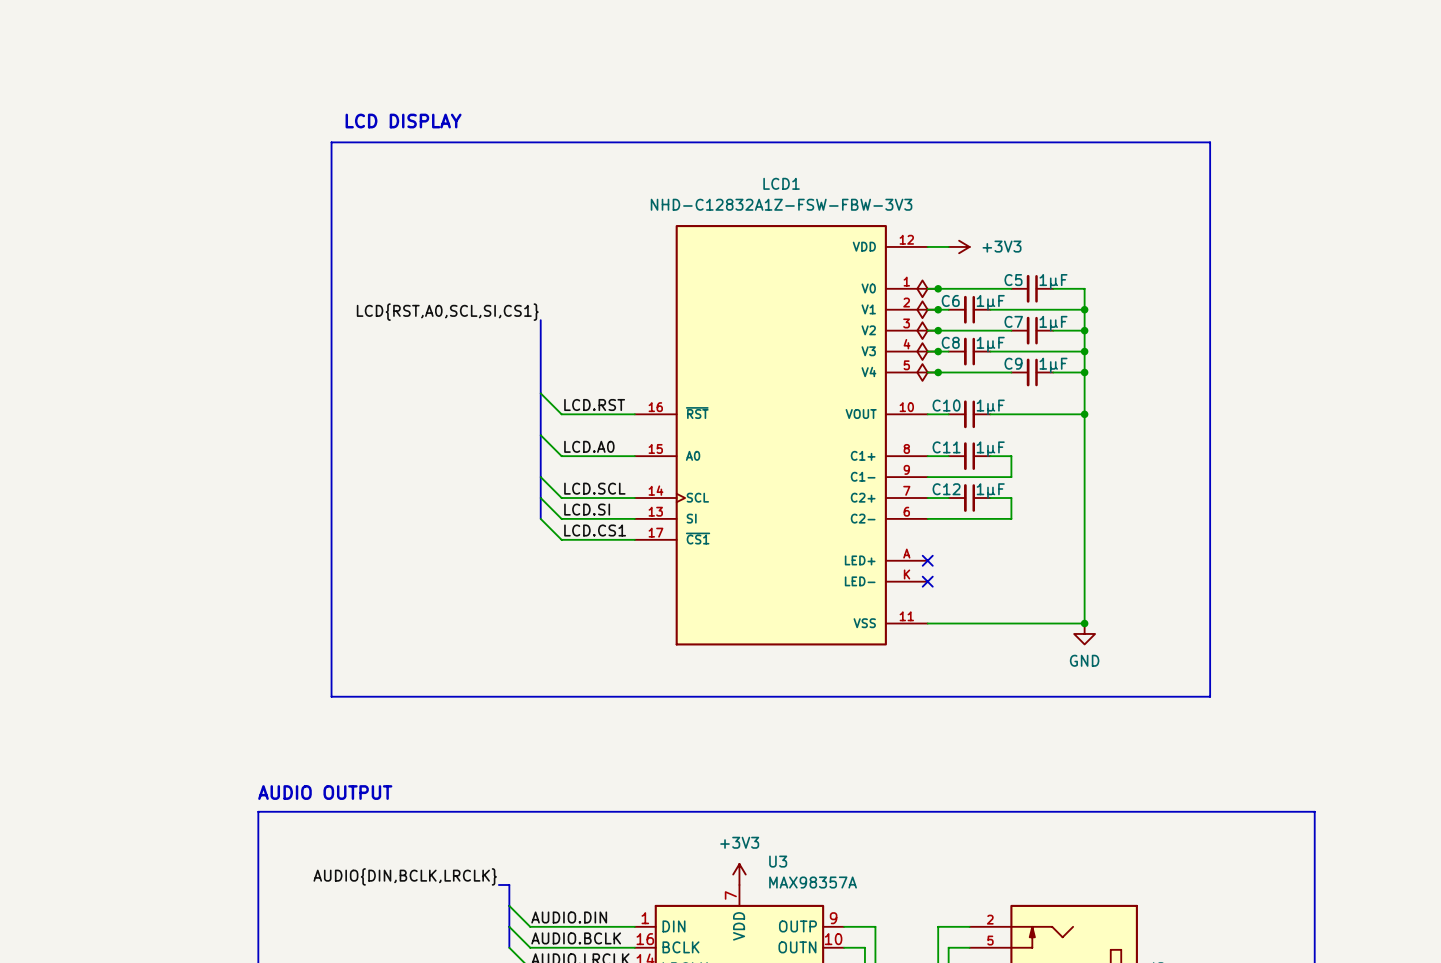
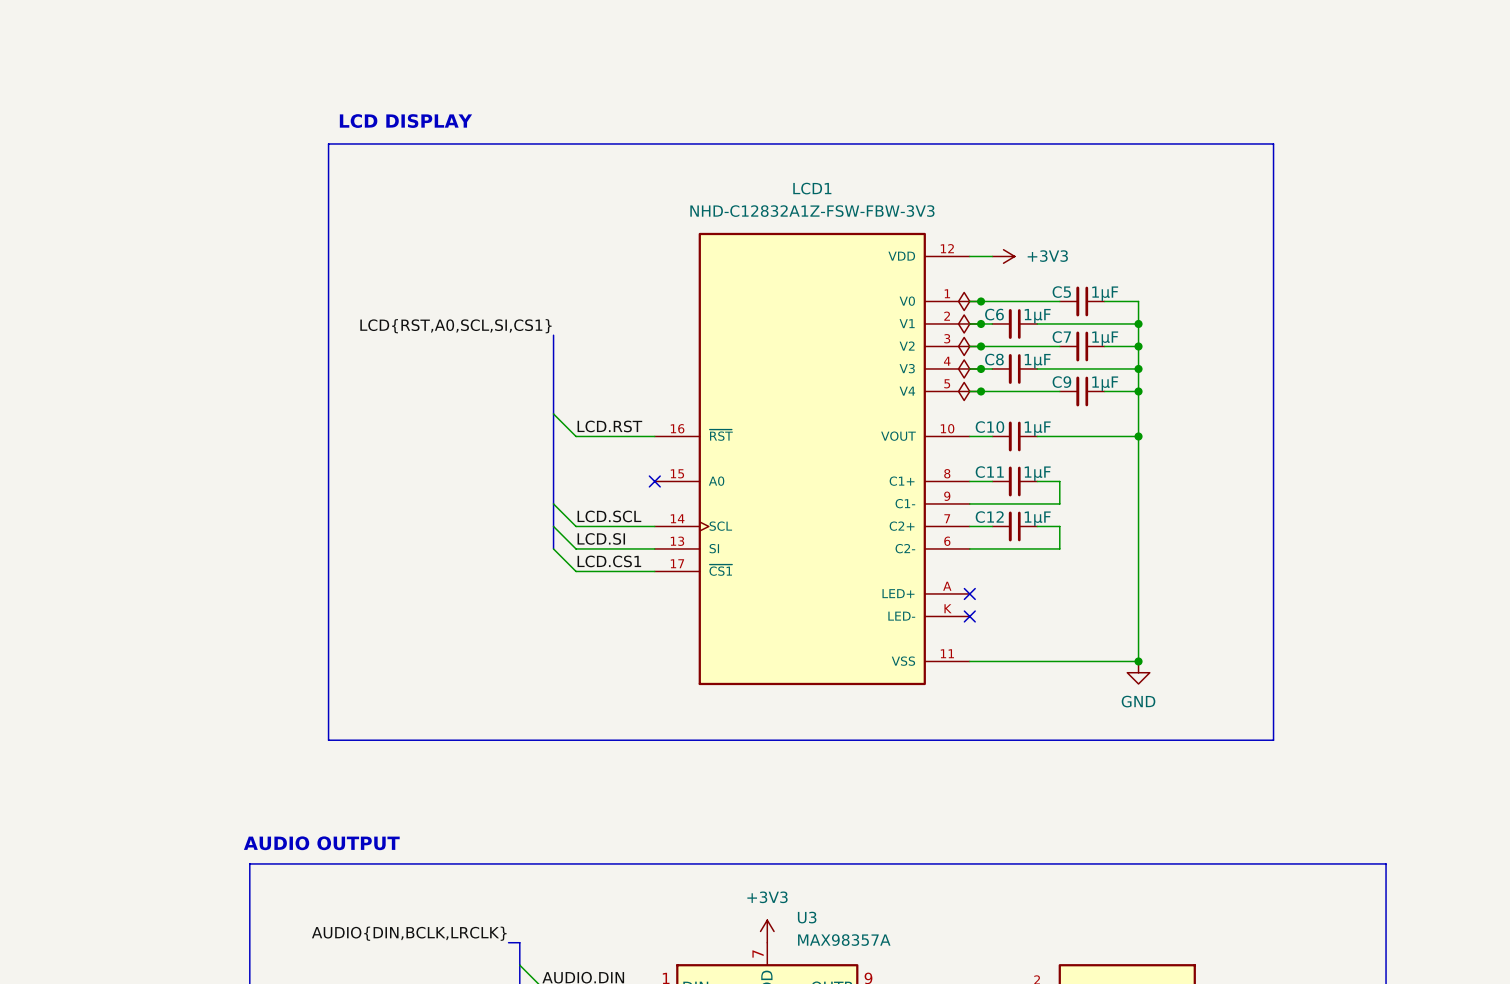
wire: (540, 435) (561, 456) (634, 456) -> none
label: LCD.A0 (589, 446) -> none
no-connect mark: none -> (654, 481)

